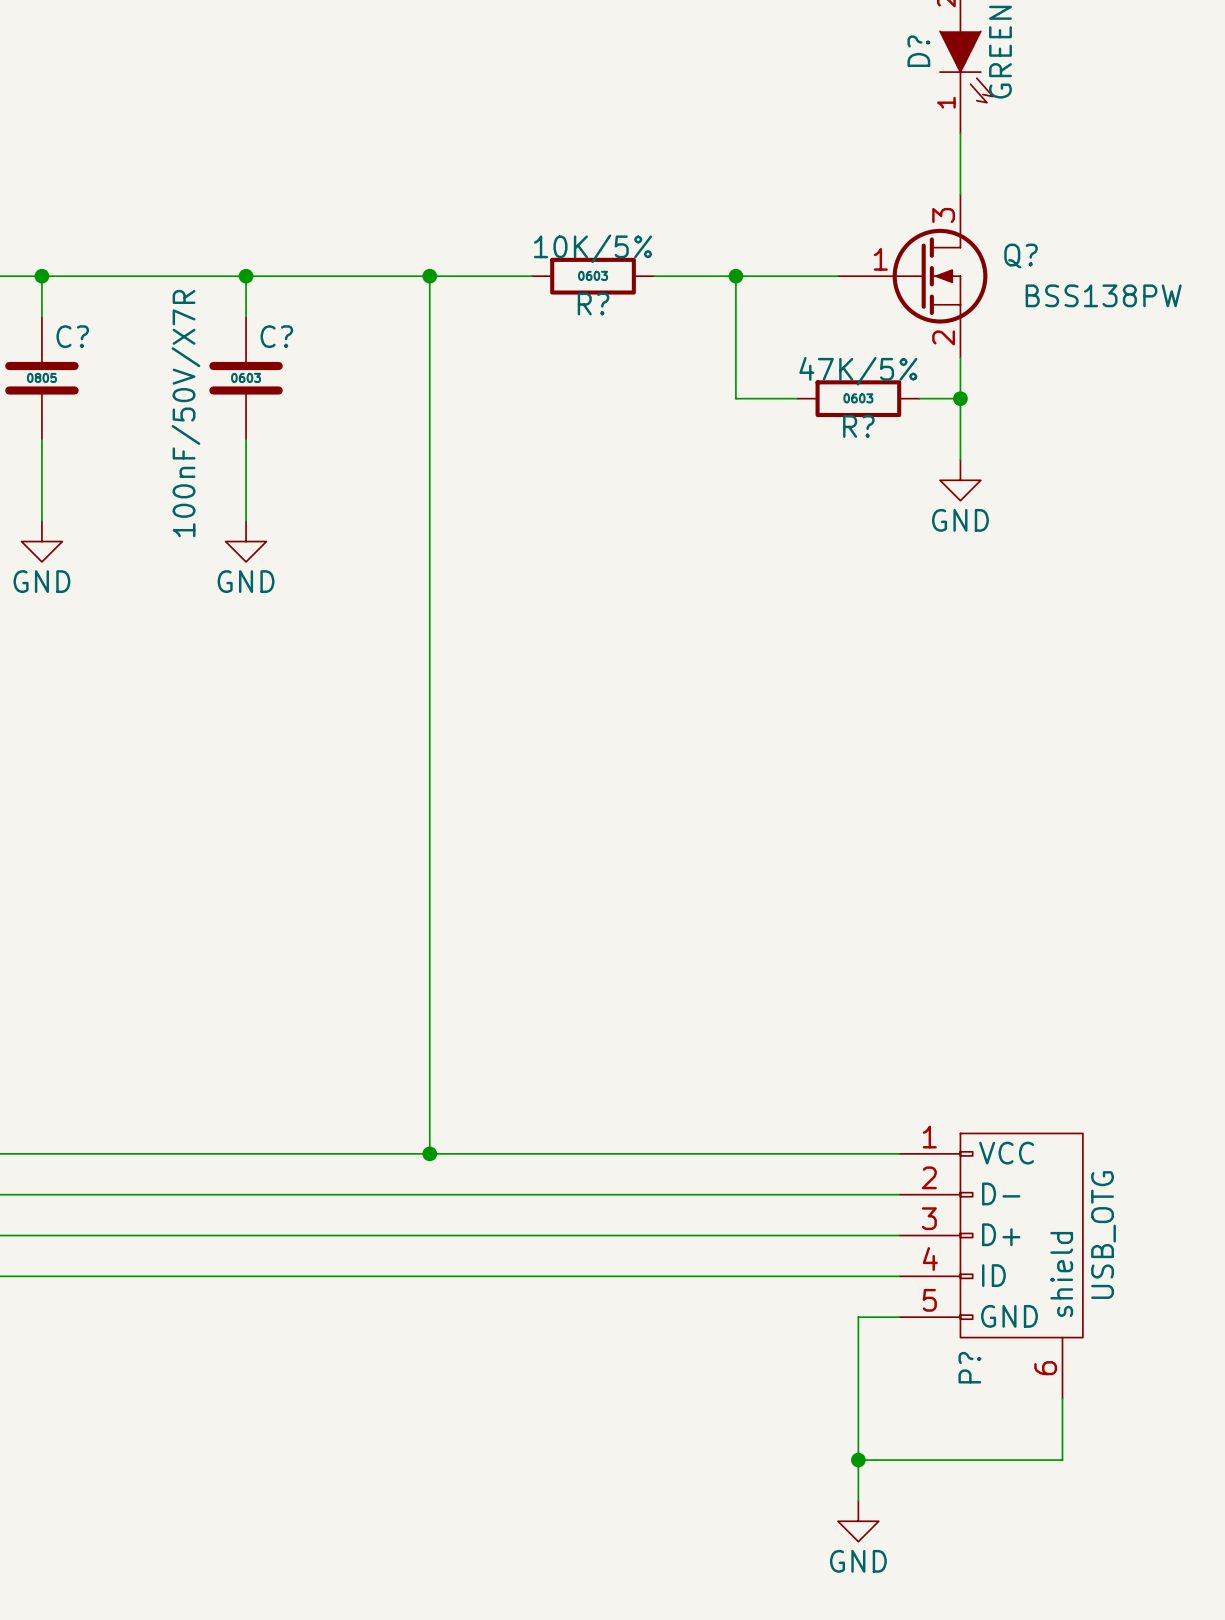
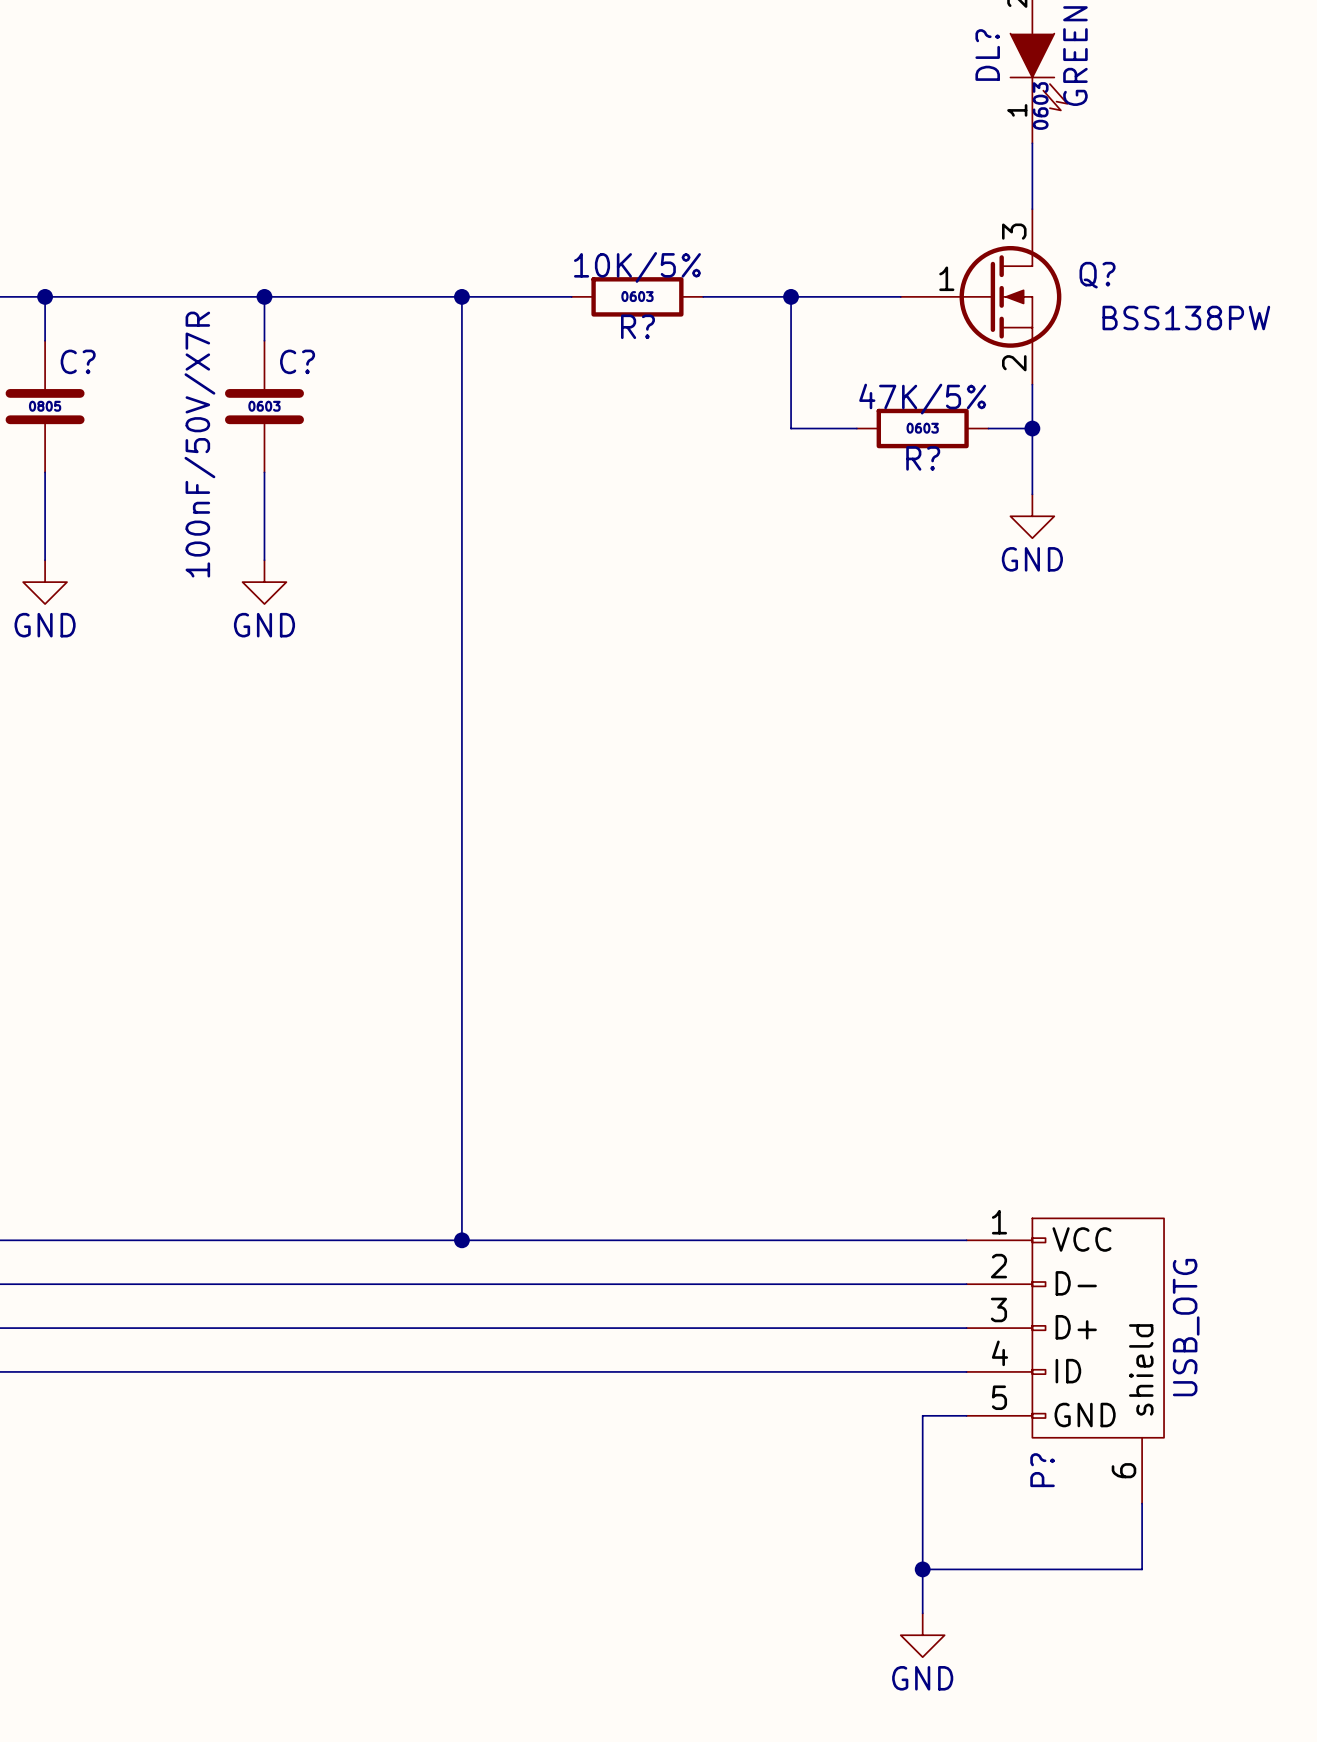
D? name: D? (918, 51) -> DL? (987, 55)
D? text: none -> 0603 (1040, 106)

